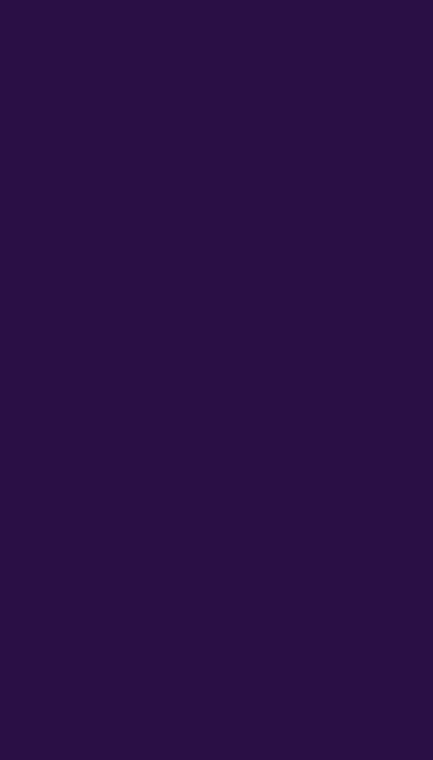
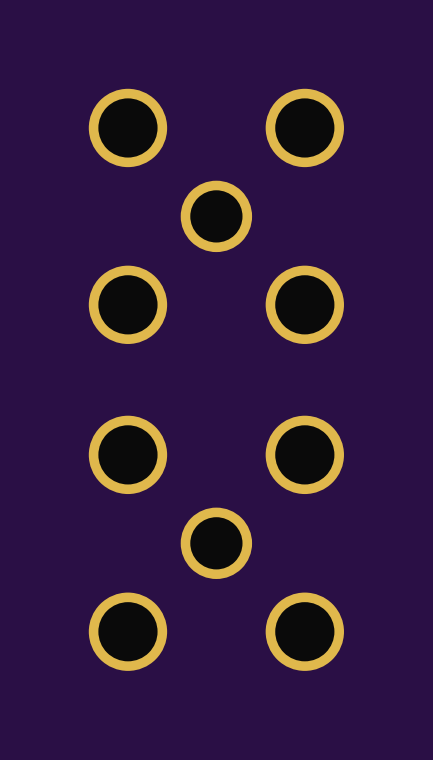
part: none -> (216, 216)
part: none -> (216, 543)

